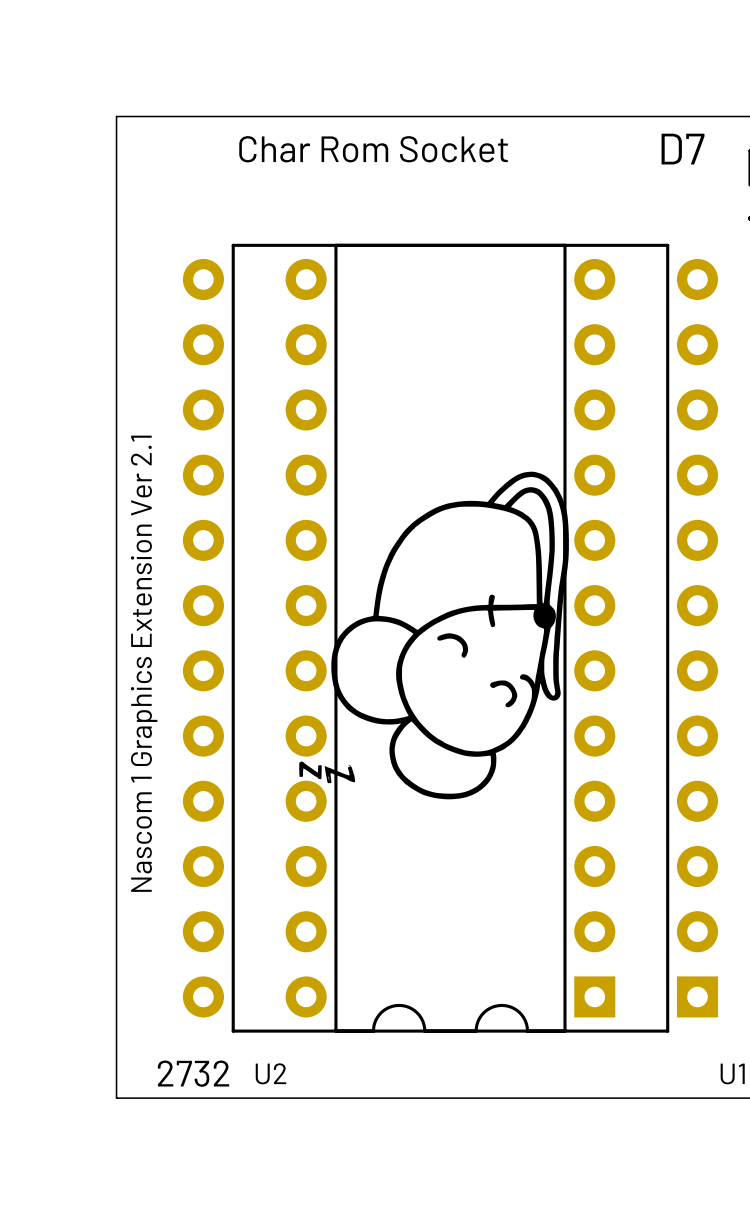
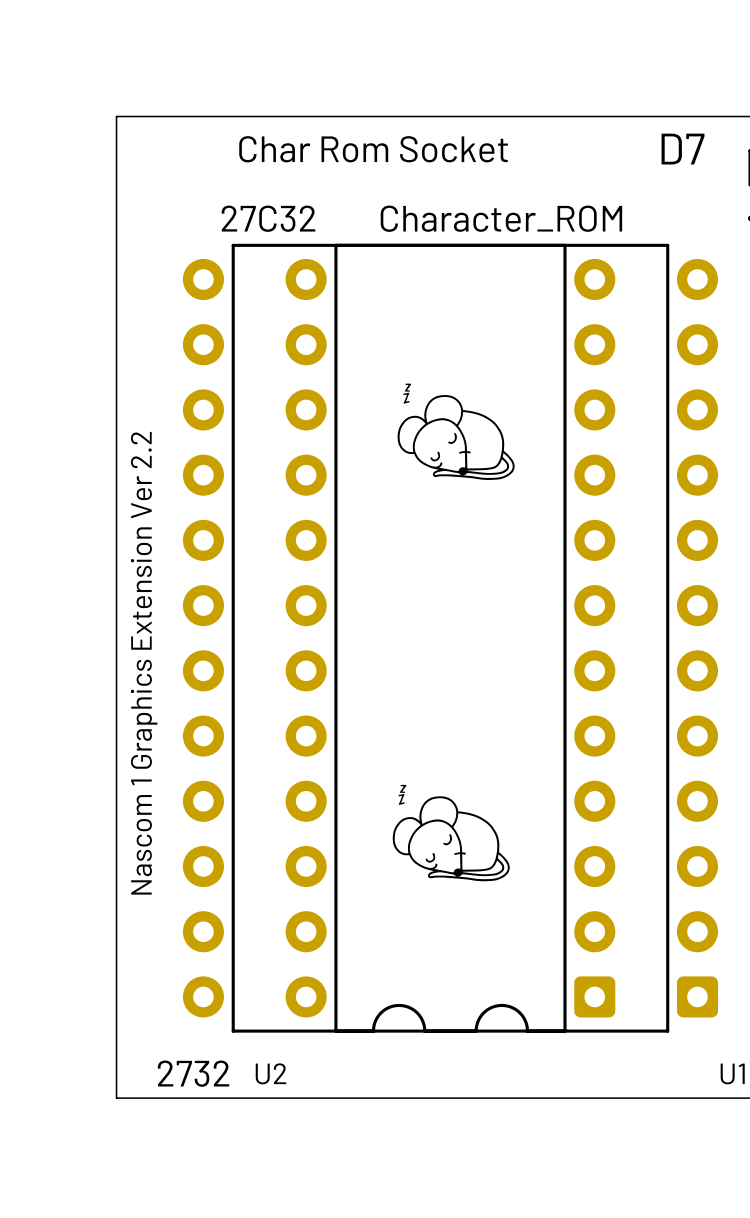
U2 value: none -> 27C32 (268, 218)
U1 value: none -> Character_ROM (501, 218)
U2 footprint: [182, 243, 616, 1033] -> [182, 243, 616, 1033]
U1 footprint: [285, 243, 719, 1033] -> [285, 243, 719, 1033]
drawing: none -> [397, 383, 515, 480]
drawing: [299, 471, 569, 800] -> none
text: Nascom 1 Graphics Extension Ver 2.1 (144, 663) -> Nascom 1 Graphics Extension Ver 2.2 (144, 663)
drawing: none -> [392, 784, 510, 882]

